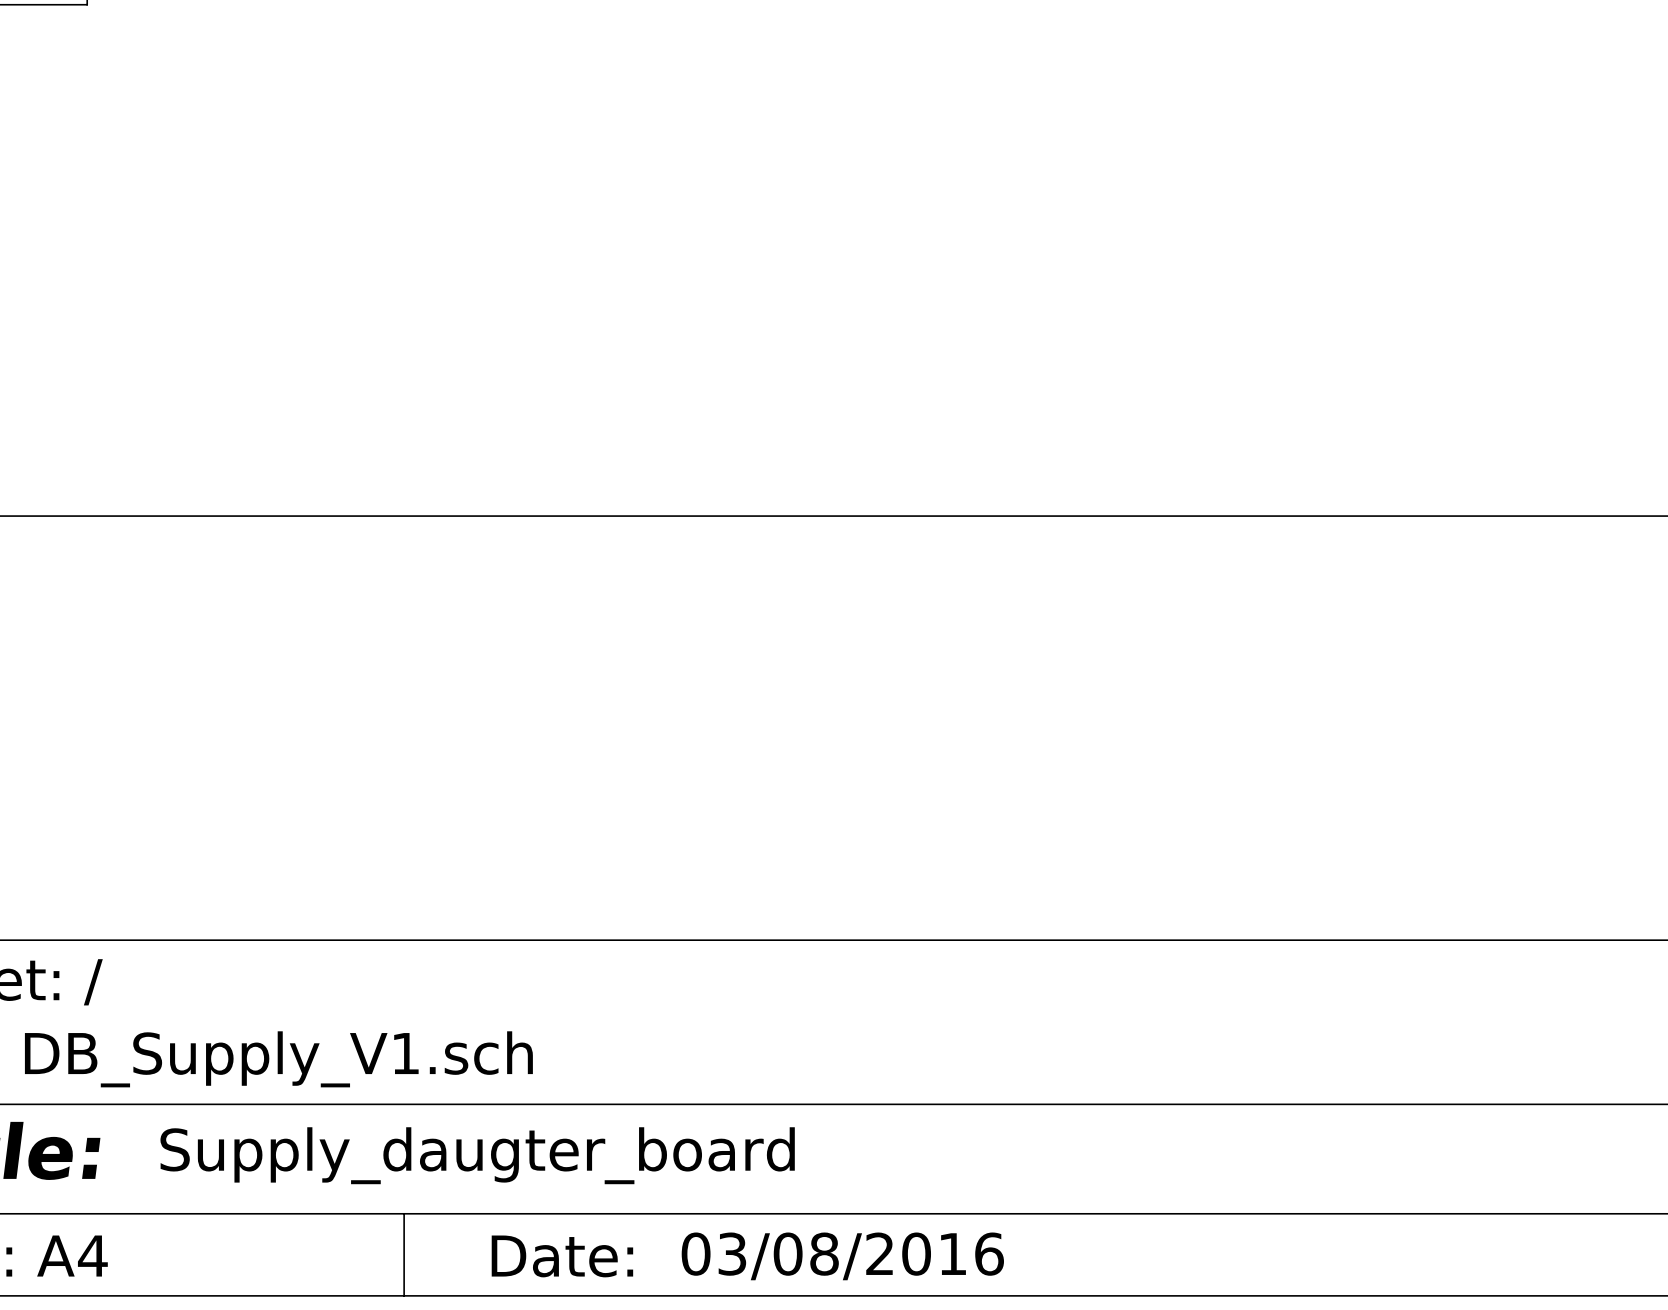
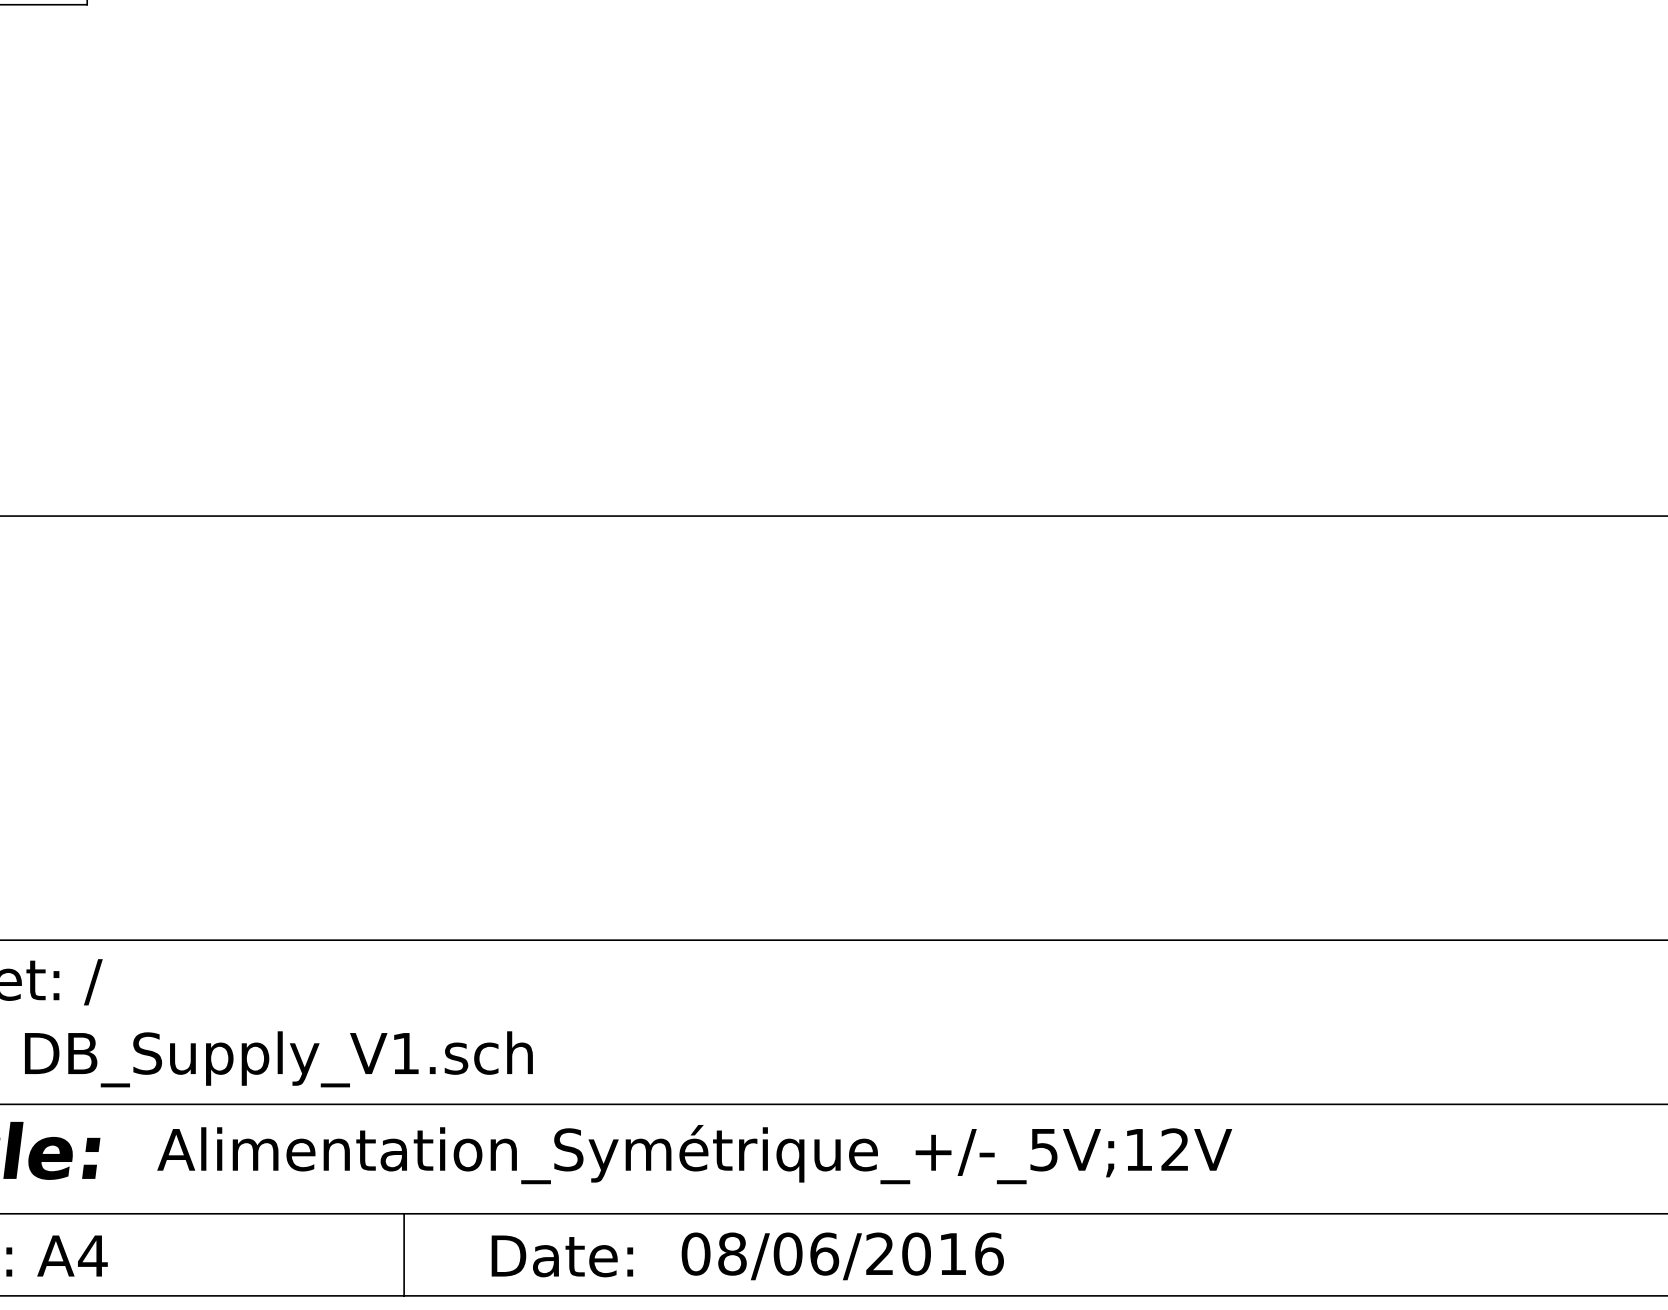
label: Supply_daugter_board (477, 1155) -> Alimentation_Symétrique_+/-_5V;12V (694, 1154)
label: 03/08/2016 (842, 1256) -> 08/06/2016 (842, 1256)

